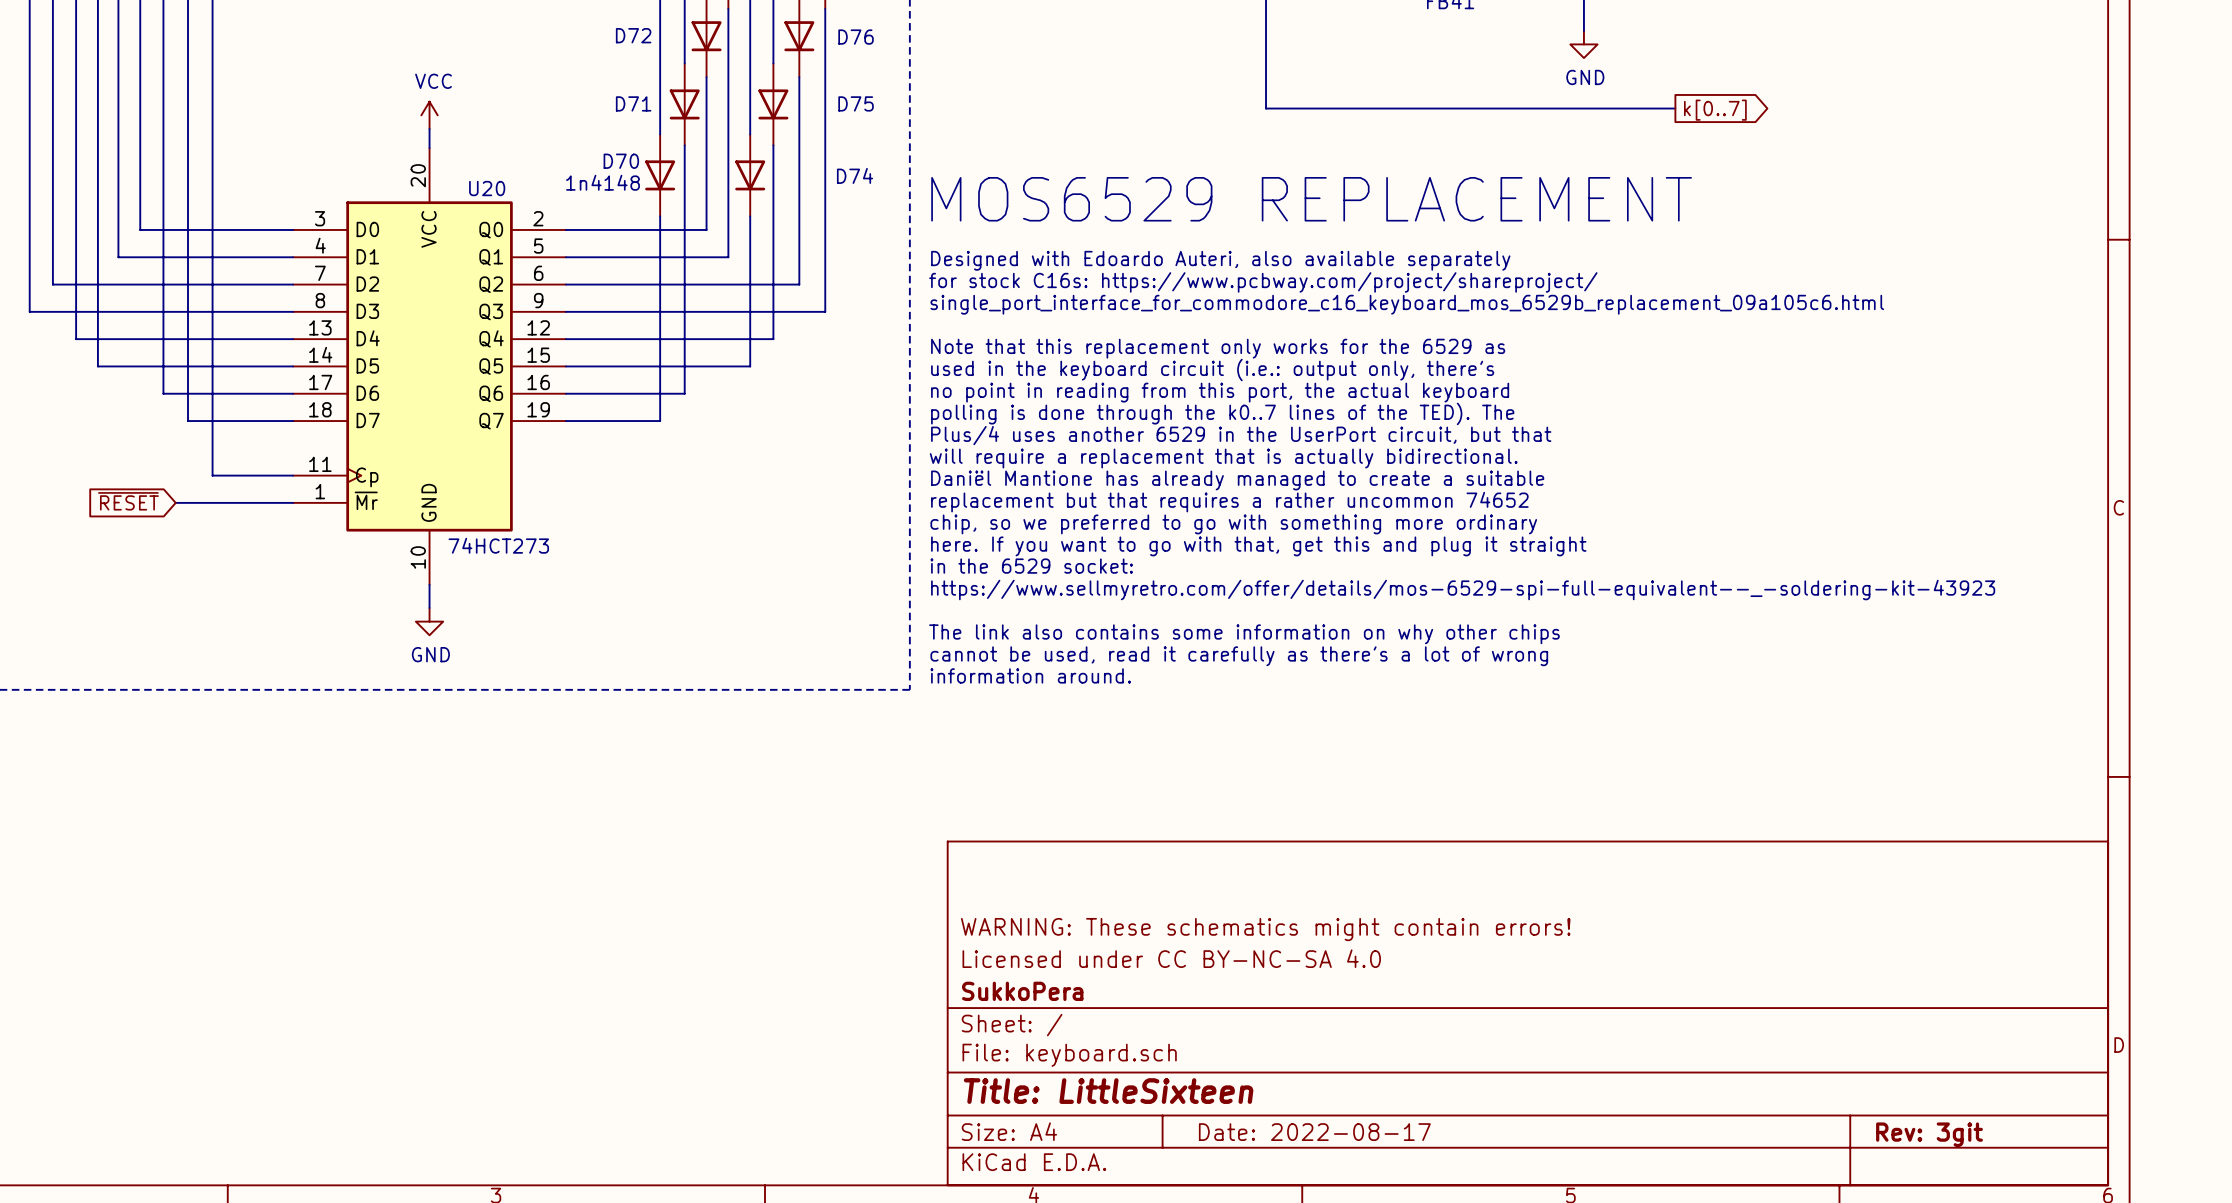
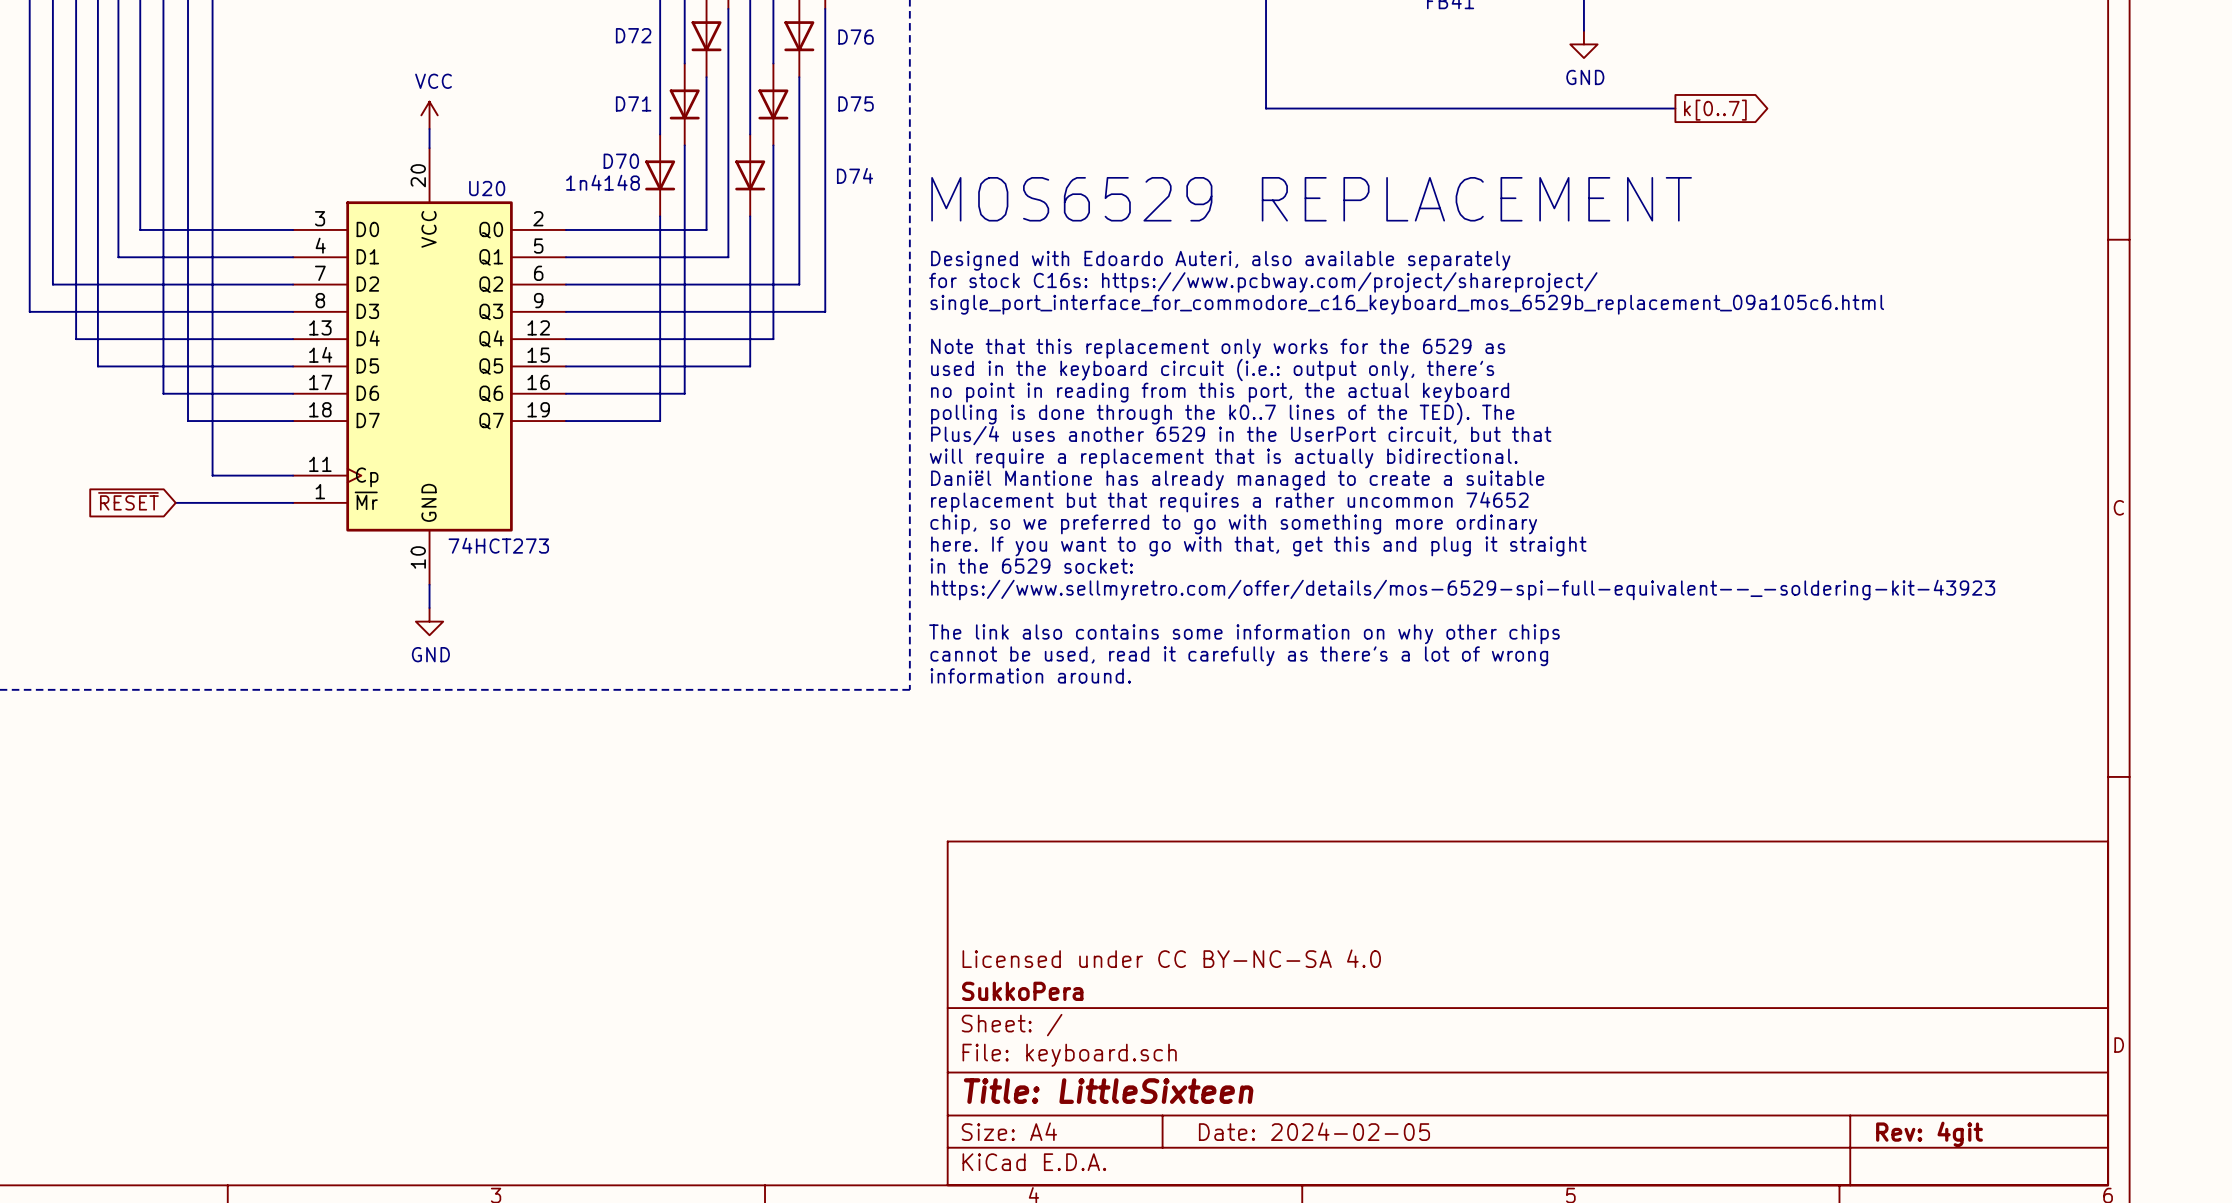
title block: WARNING: These schematics might contain errors! (1265, 929) -> none
title block: Date: 2022-08-17 (1314, 1132) -> Date: 2024-02-05 (1314, 1131)
title block: Rev: 3git (1929, 1134) -> Rev: 4git (1929, 1134)

